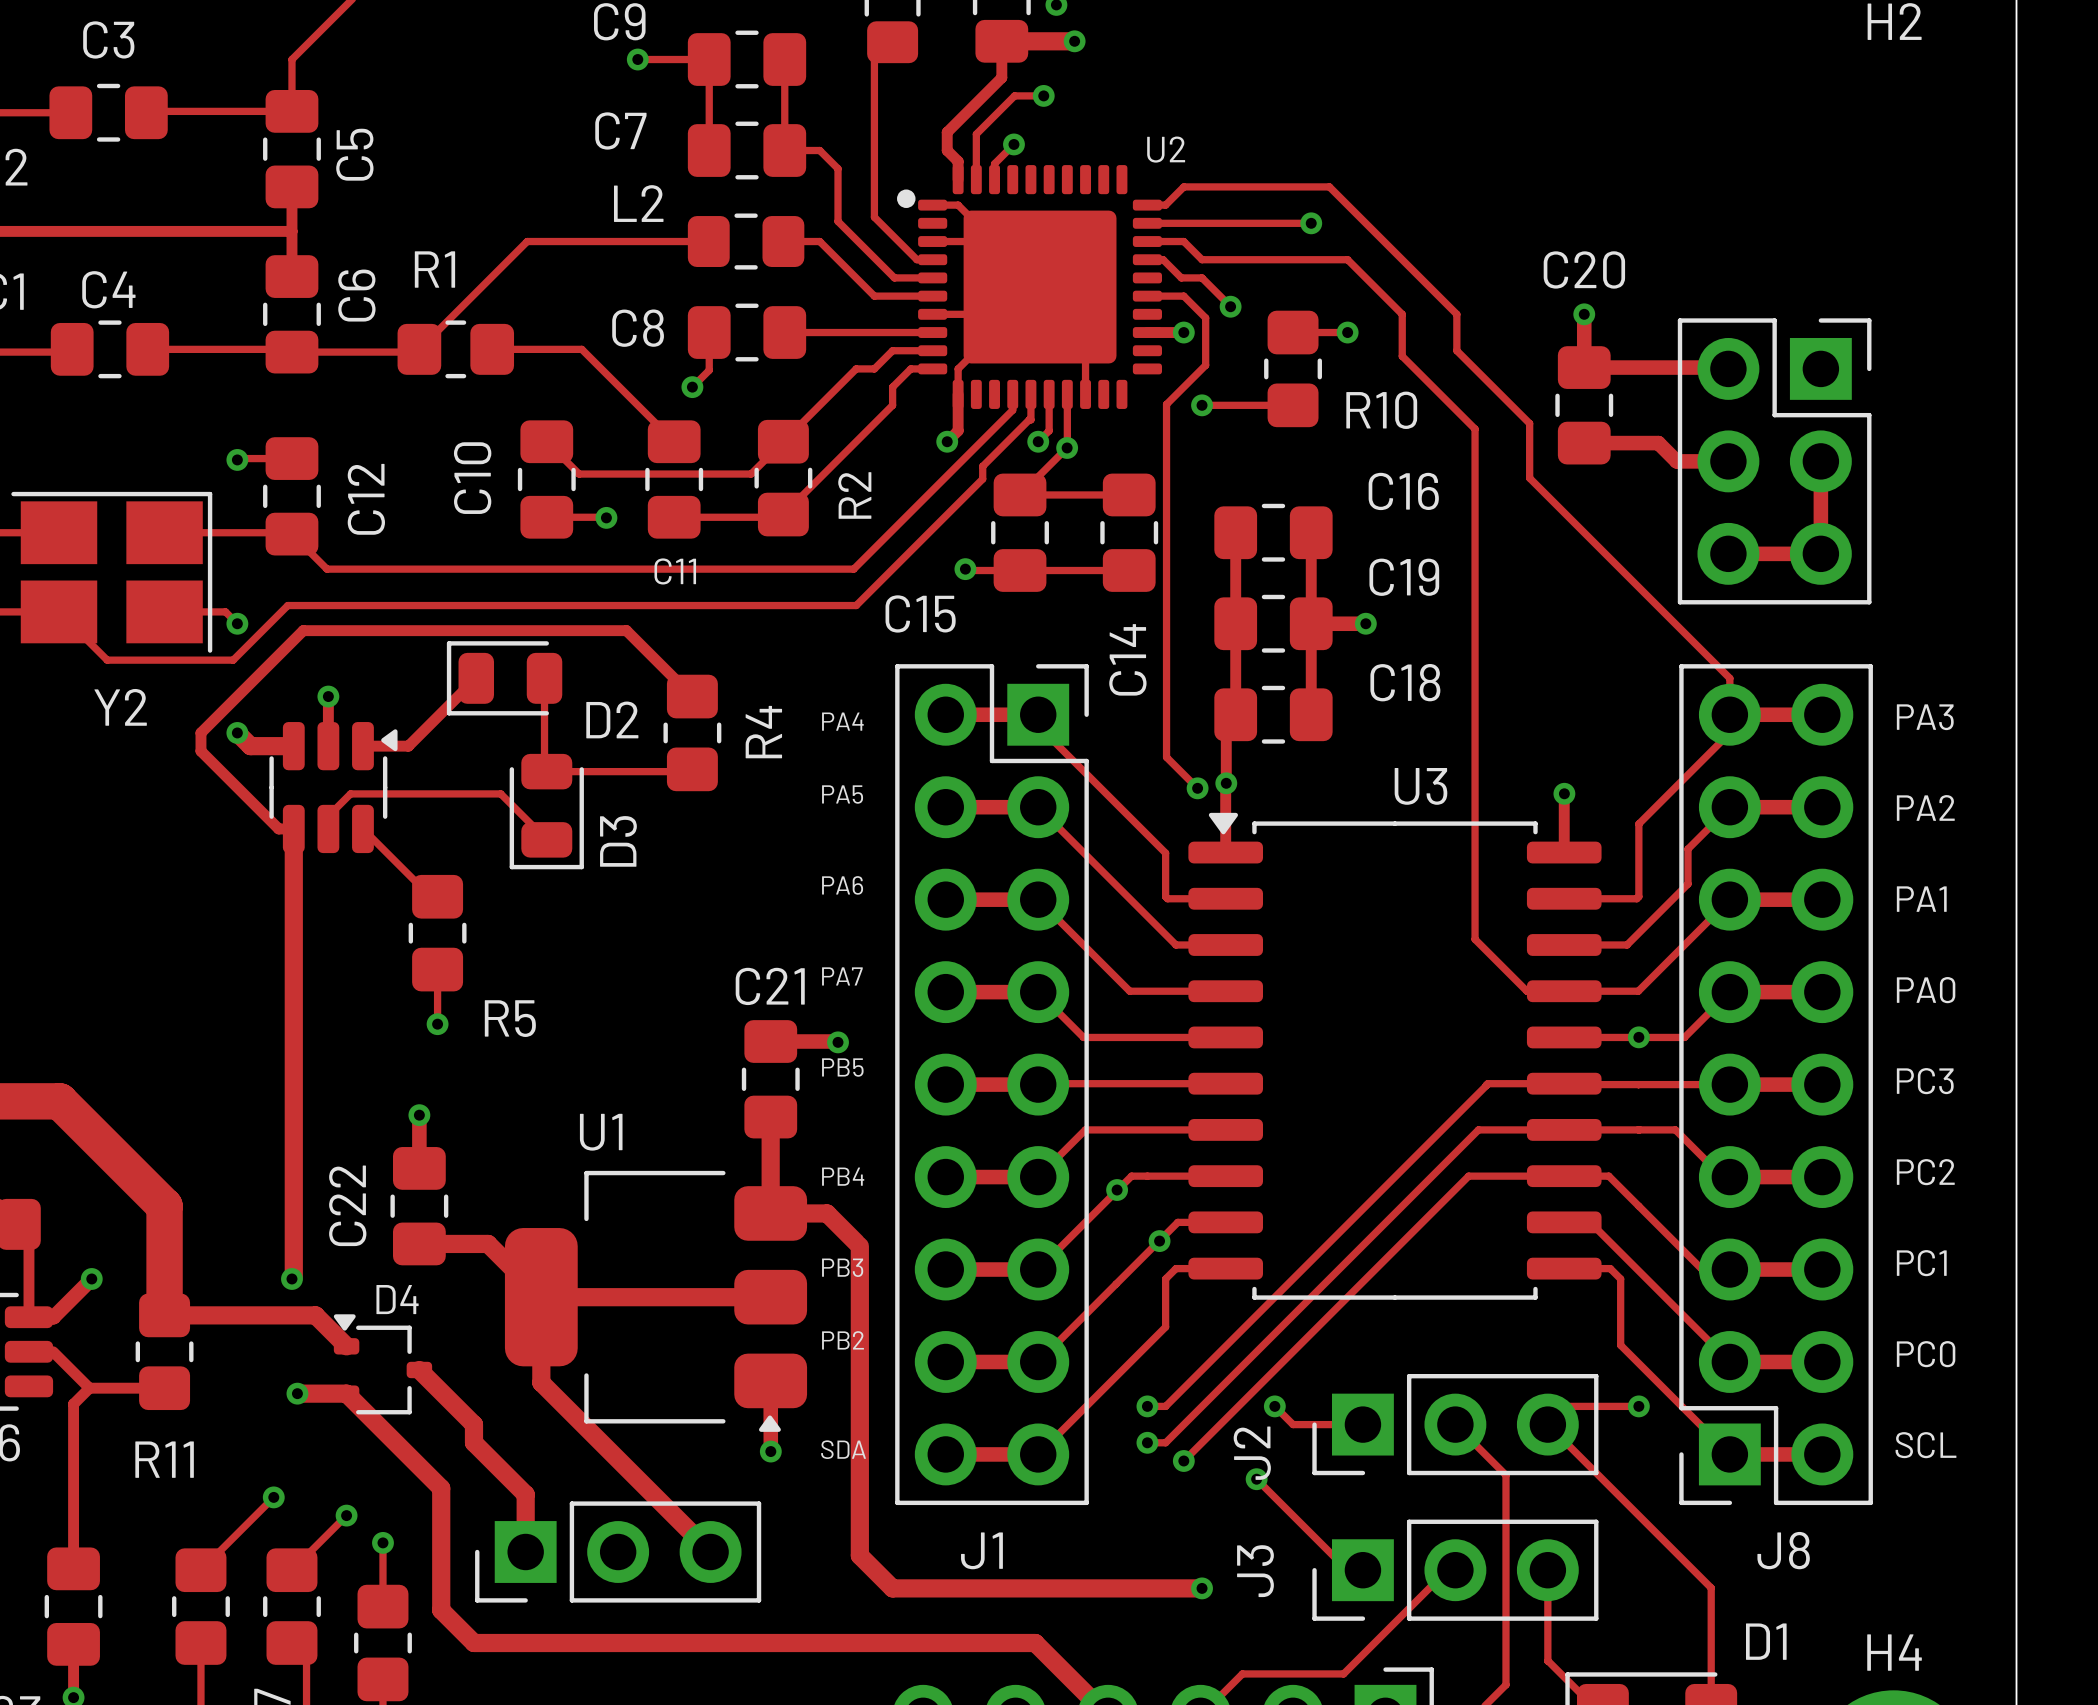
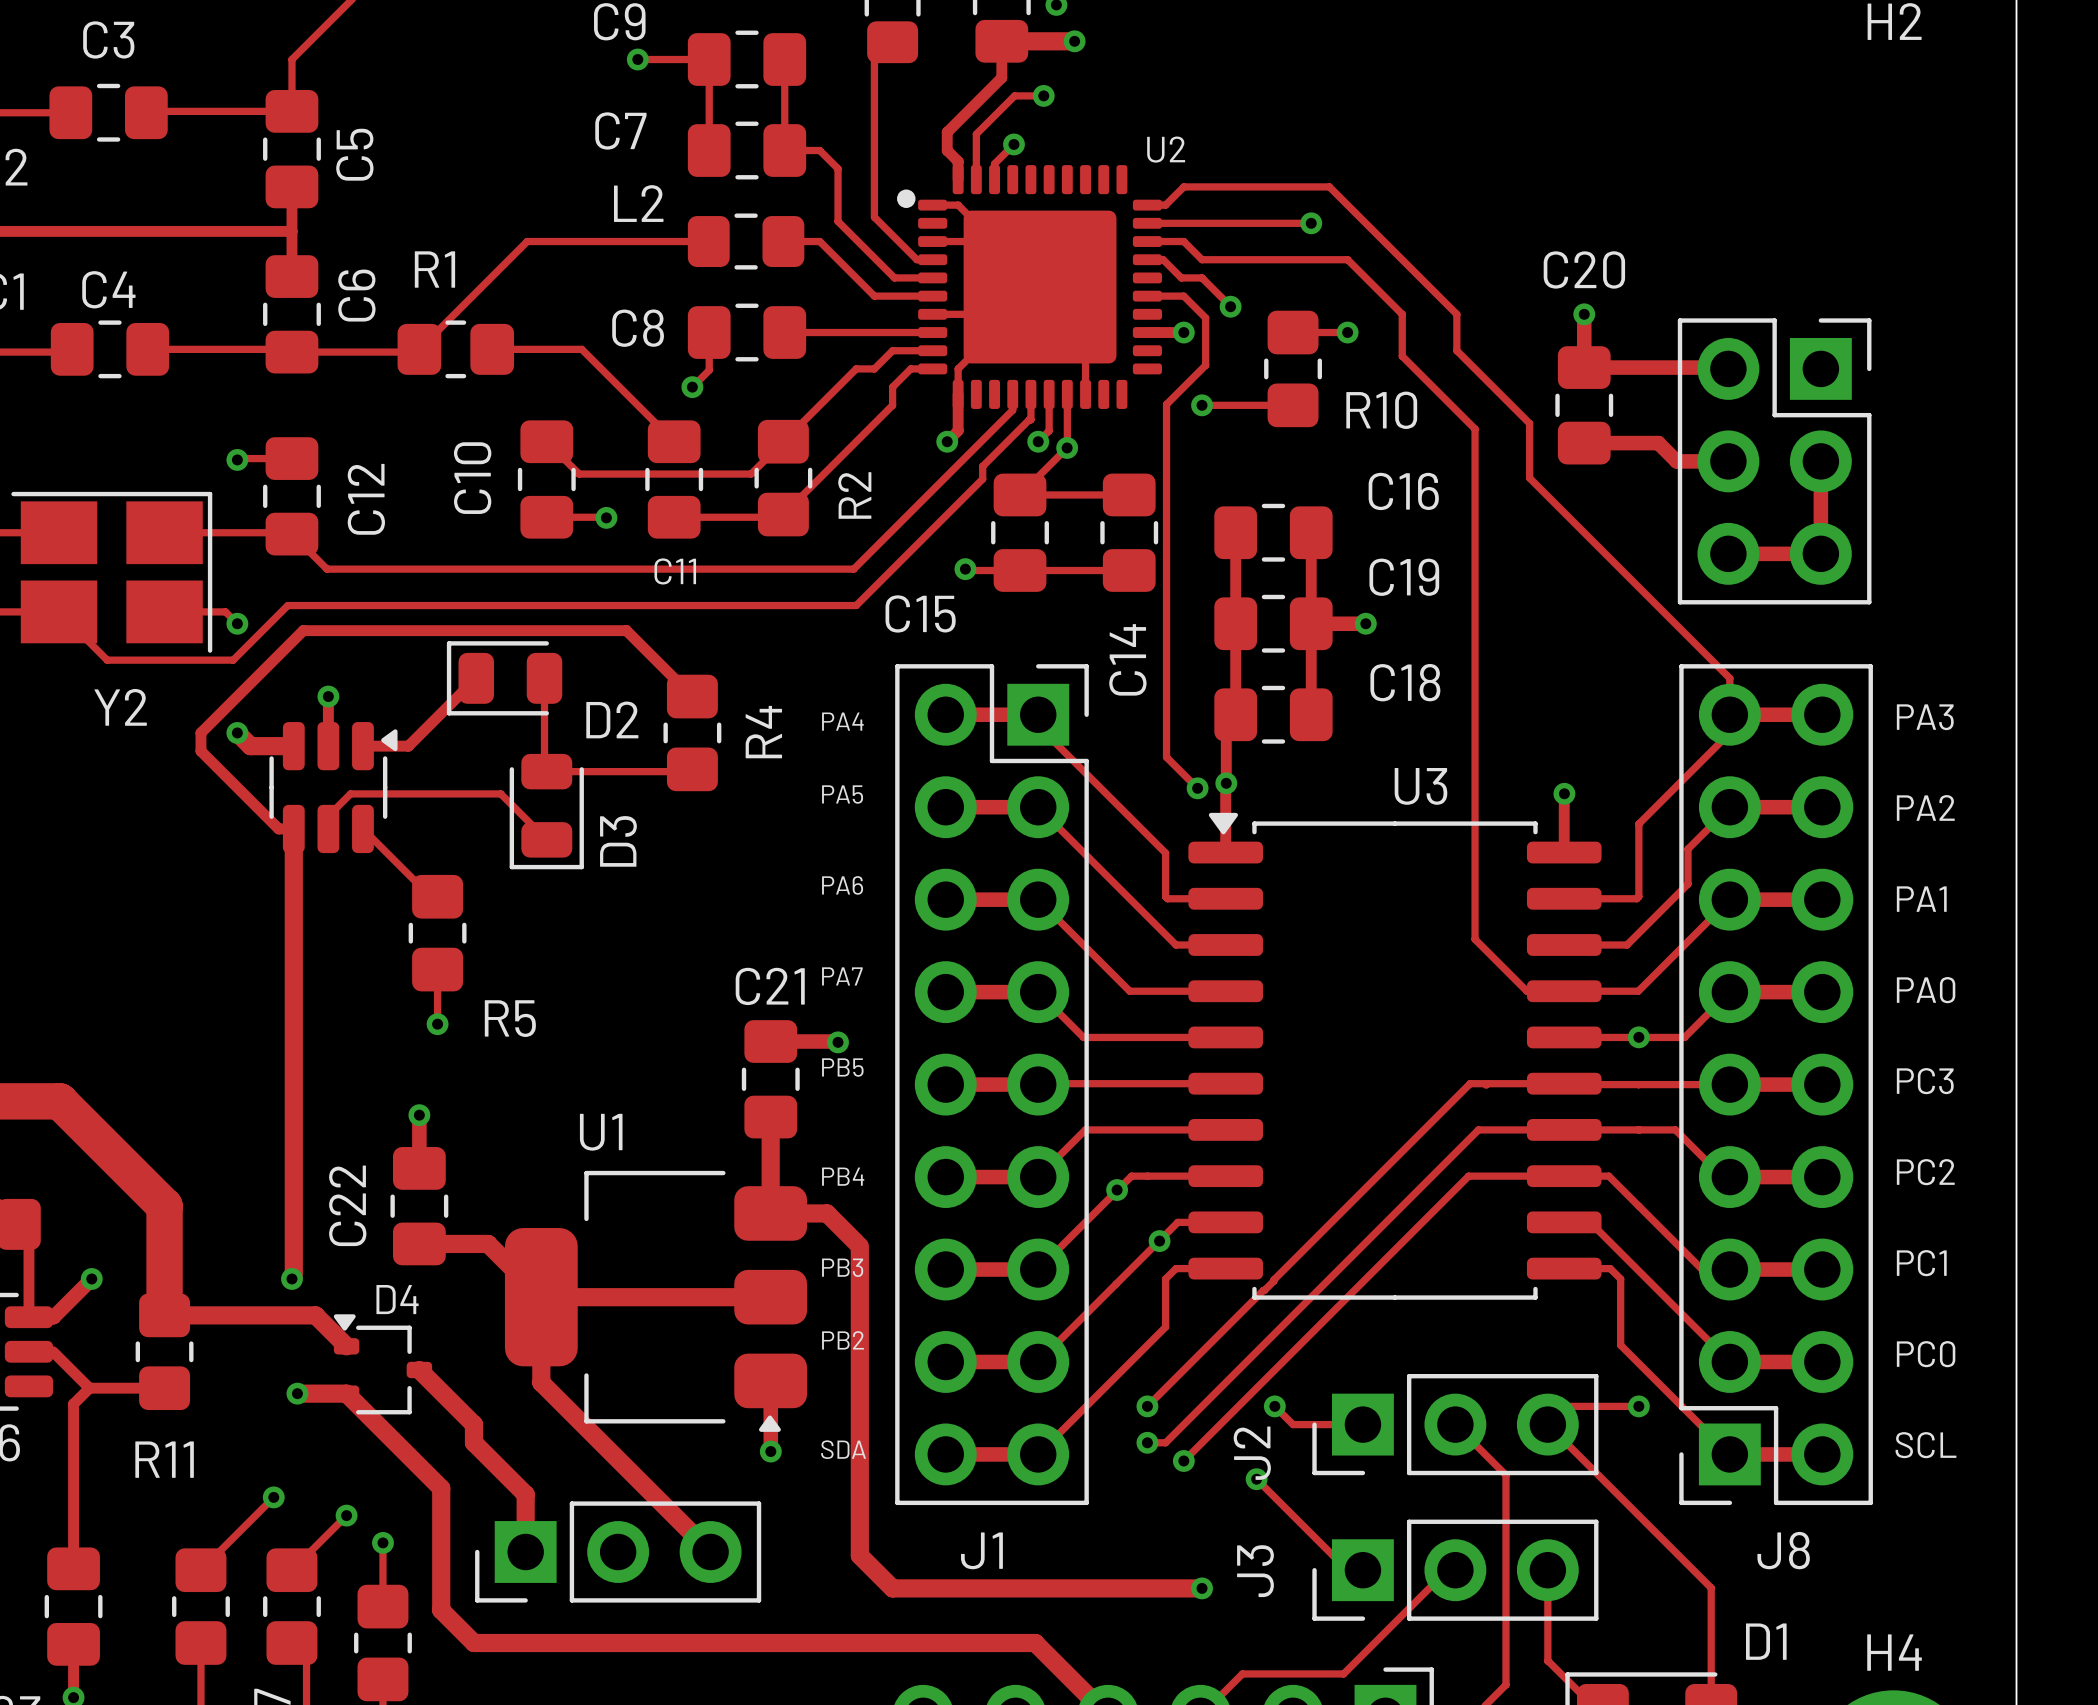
track: (1486, 1085) (1165, 1406) (1147, 1406) -> (1487, 1083) (1470, 1083) (1147, 1406)

